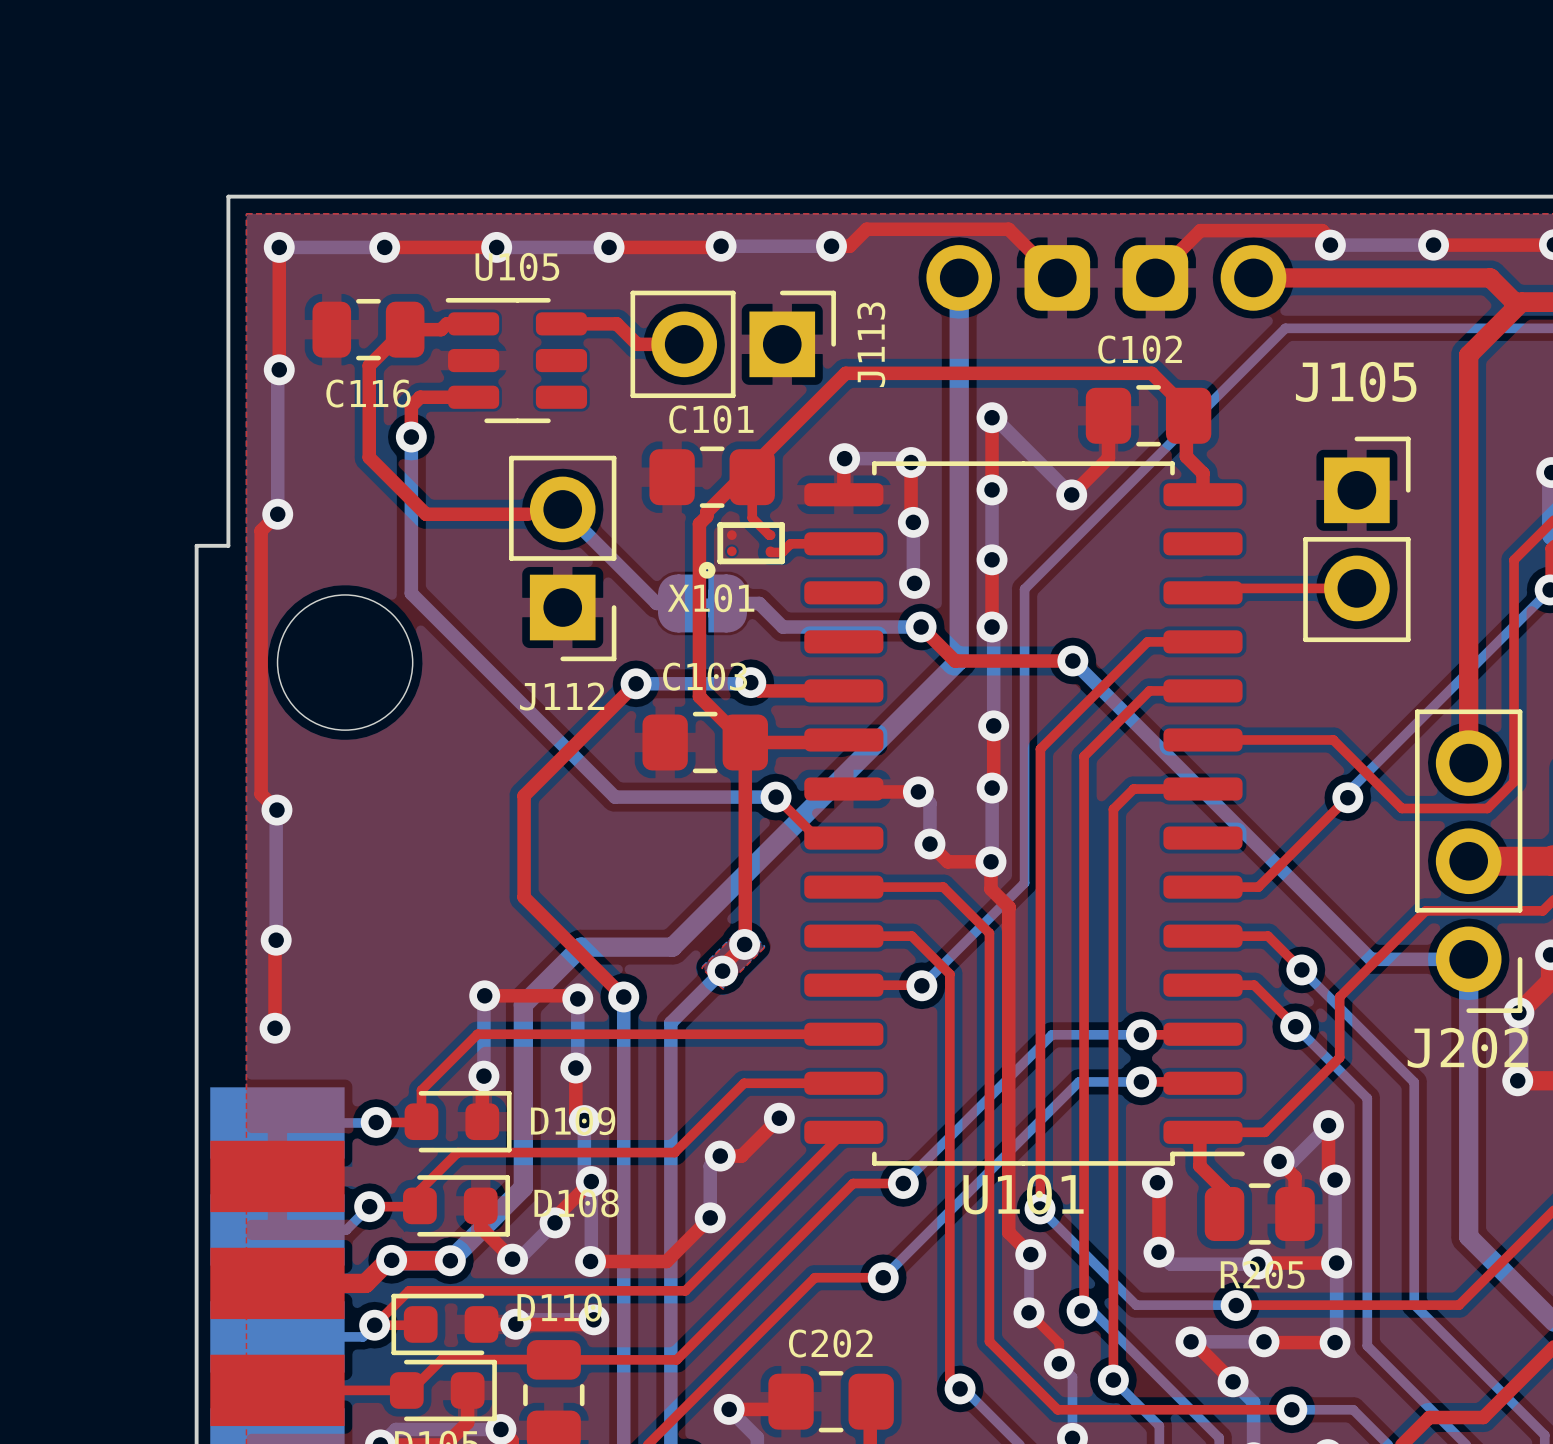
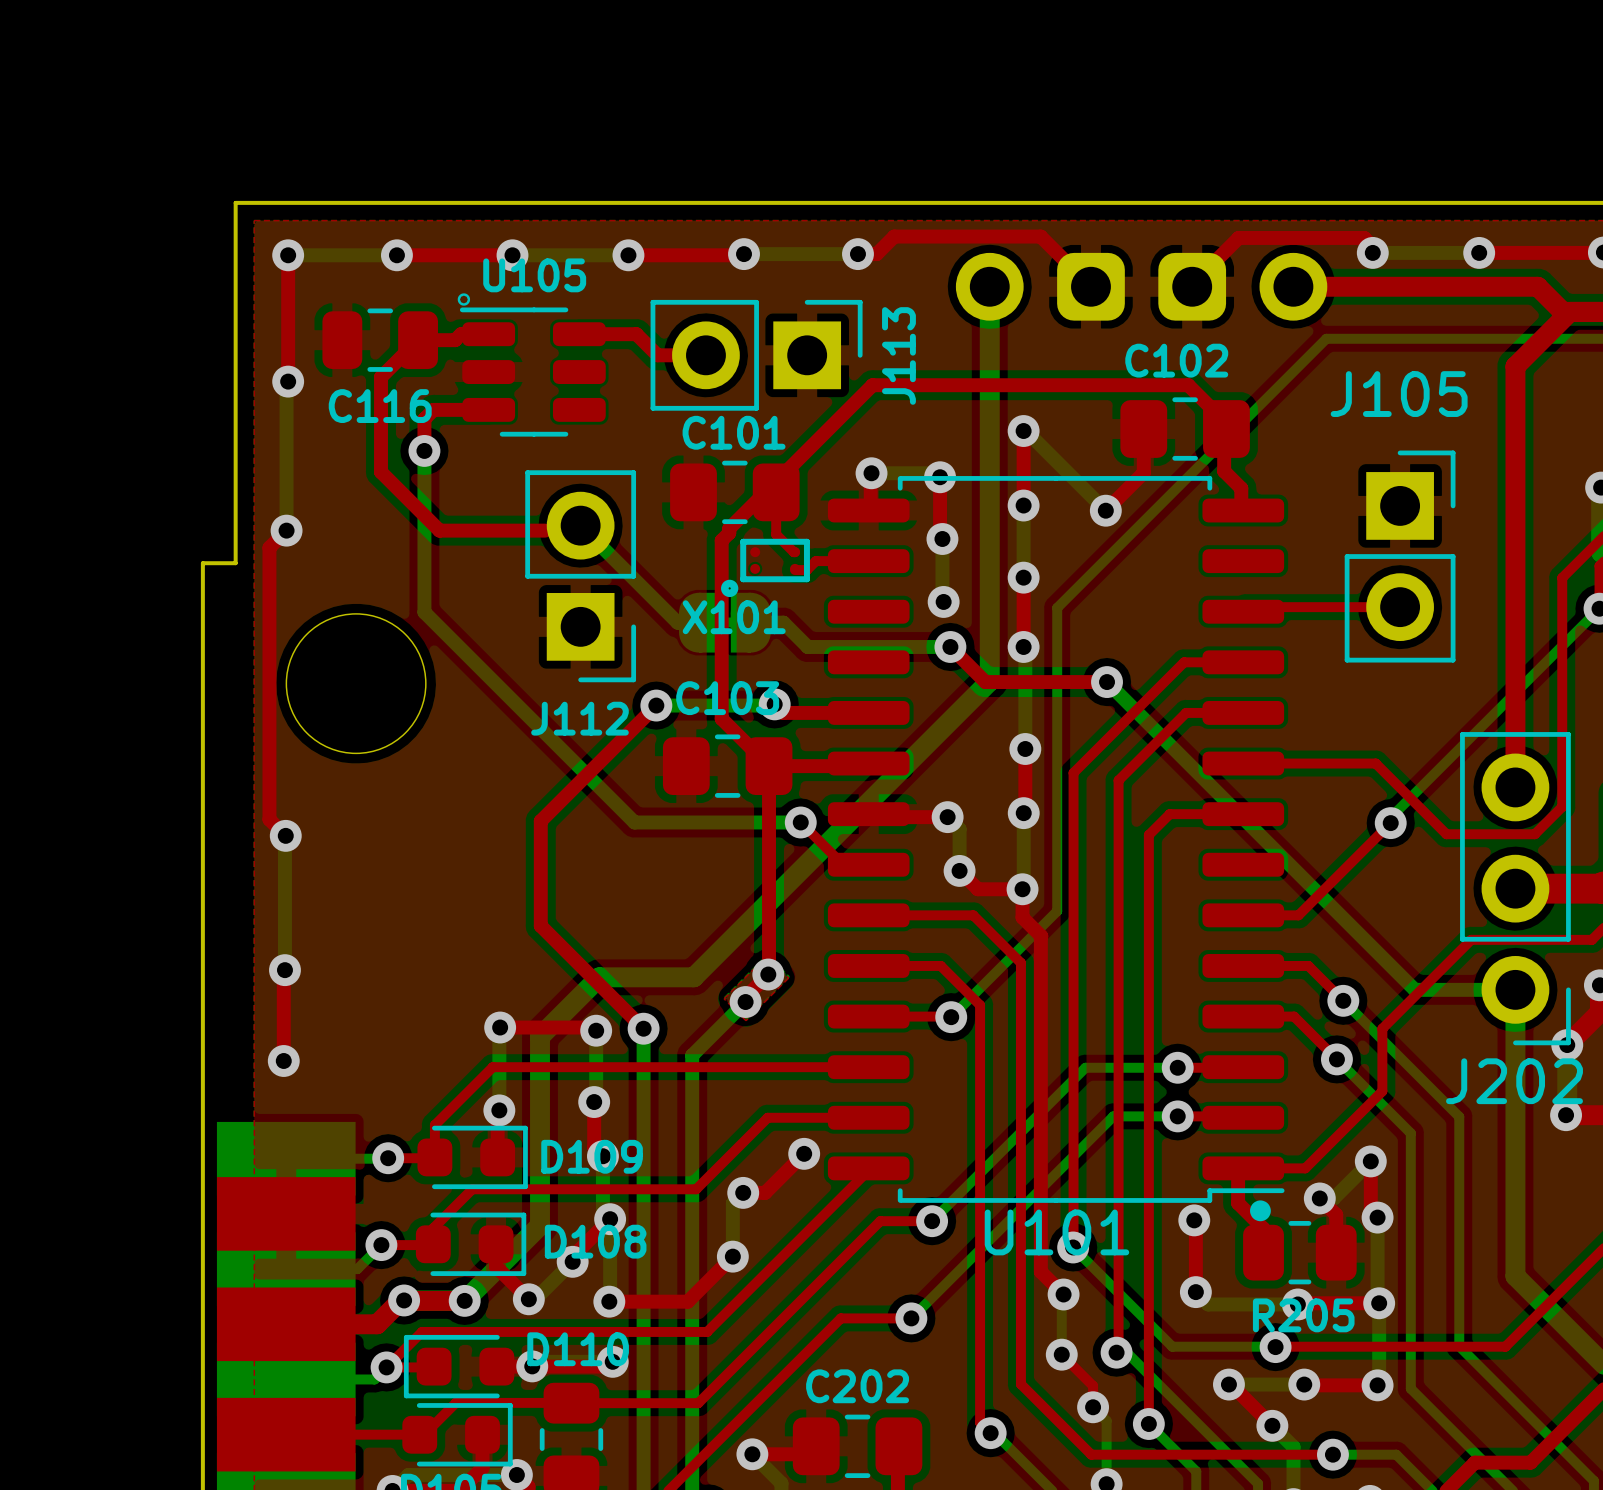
U105 footprint: [445, 298, 588, 424] -> [457, 293, 606, 437]
U101 footprint: [804, 461, 1245, 1166] -> [827, 476, 1285, 1222]

